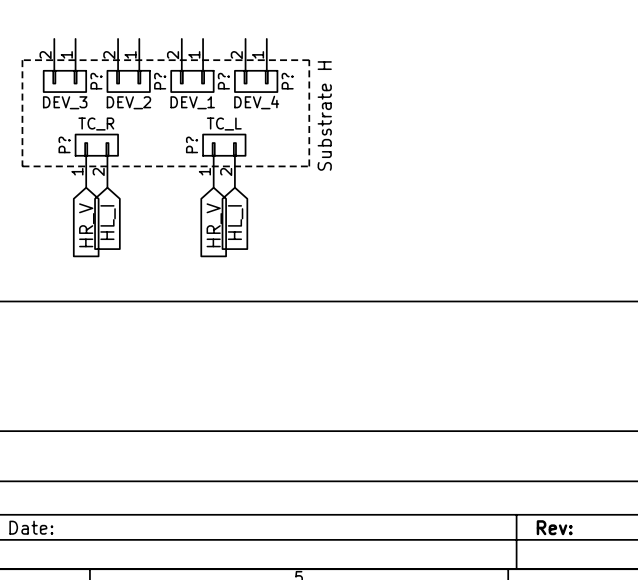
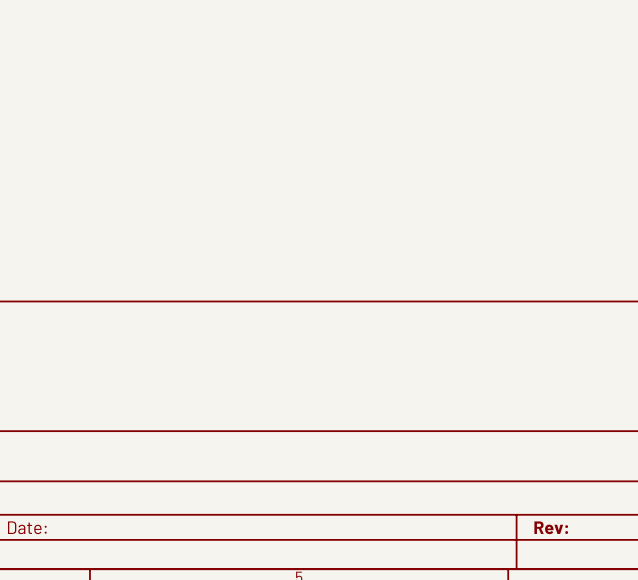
line: (22, 60) (309, 60) (309, 166) (22, 166) (22, 60) -> none
P?: DEV_3 (64, 65) -> none
P?: DEV_2 (128, 65) -> none
P?: DEV_1 (192, 65) -> none
P?: DEV_4 (256, 65) -> none
text: Substrate H (324, 115) -> none
P?: TC_R (96, 161) -> none
P?: TC_L (224, 161) -> none
global label: HL_I (108, 222) -> none
global label: HL_I (235, 222) -> none
global label: HR_V (86, 225) -> none
global label: HR_V (214, 225) -> none

